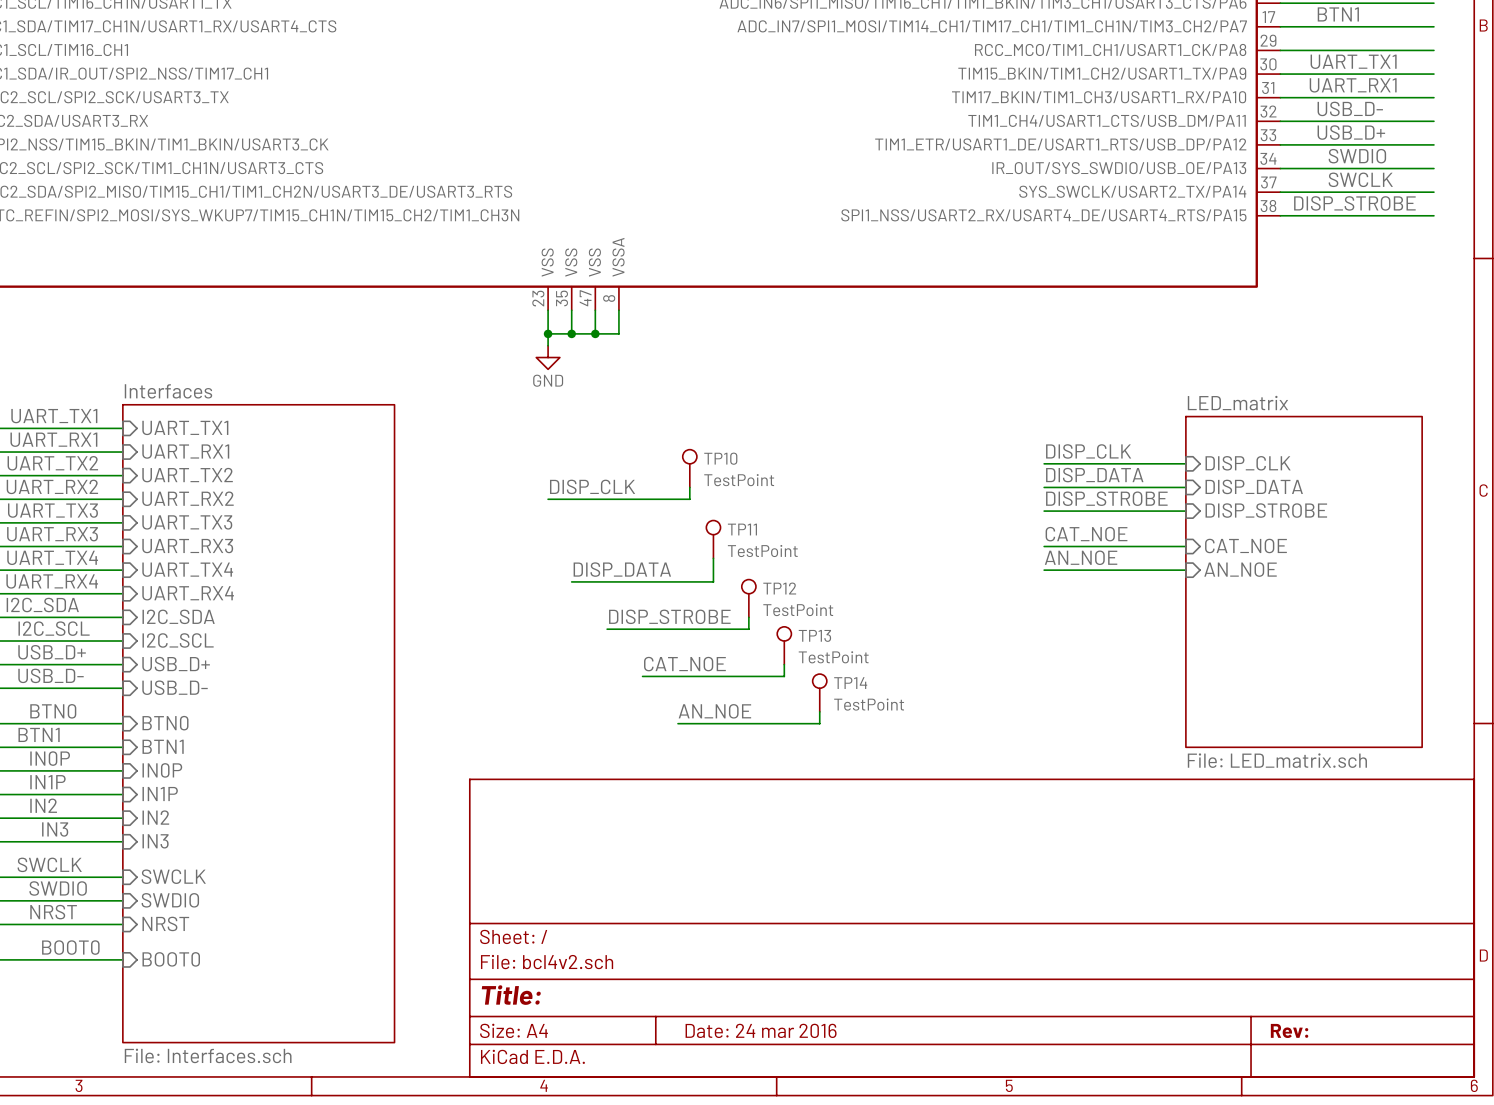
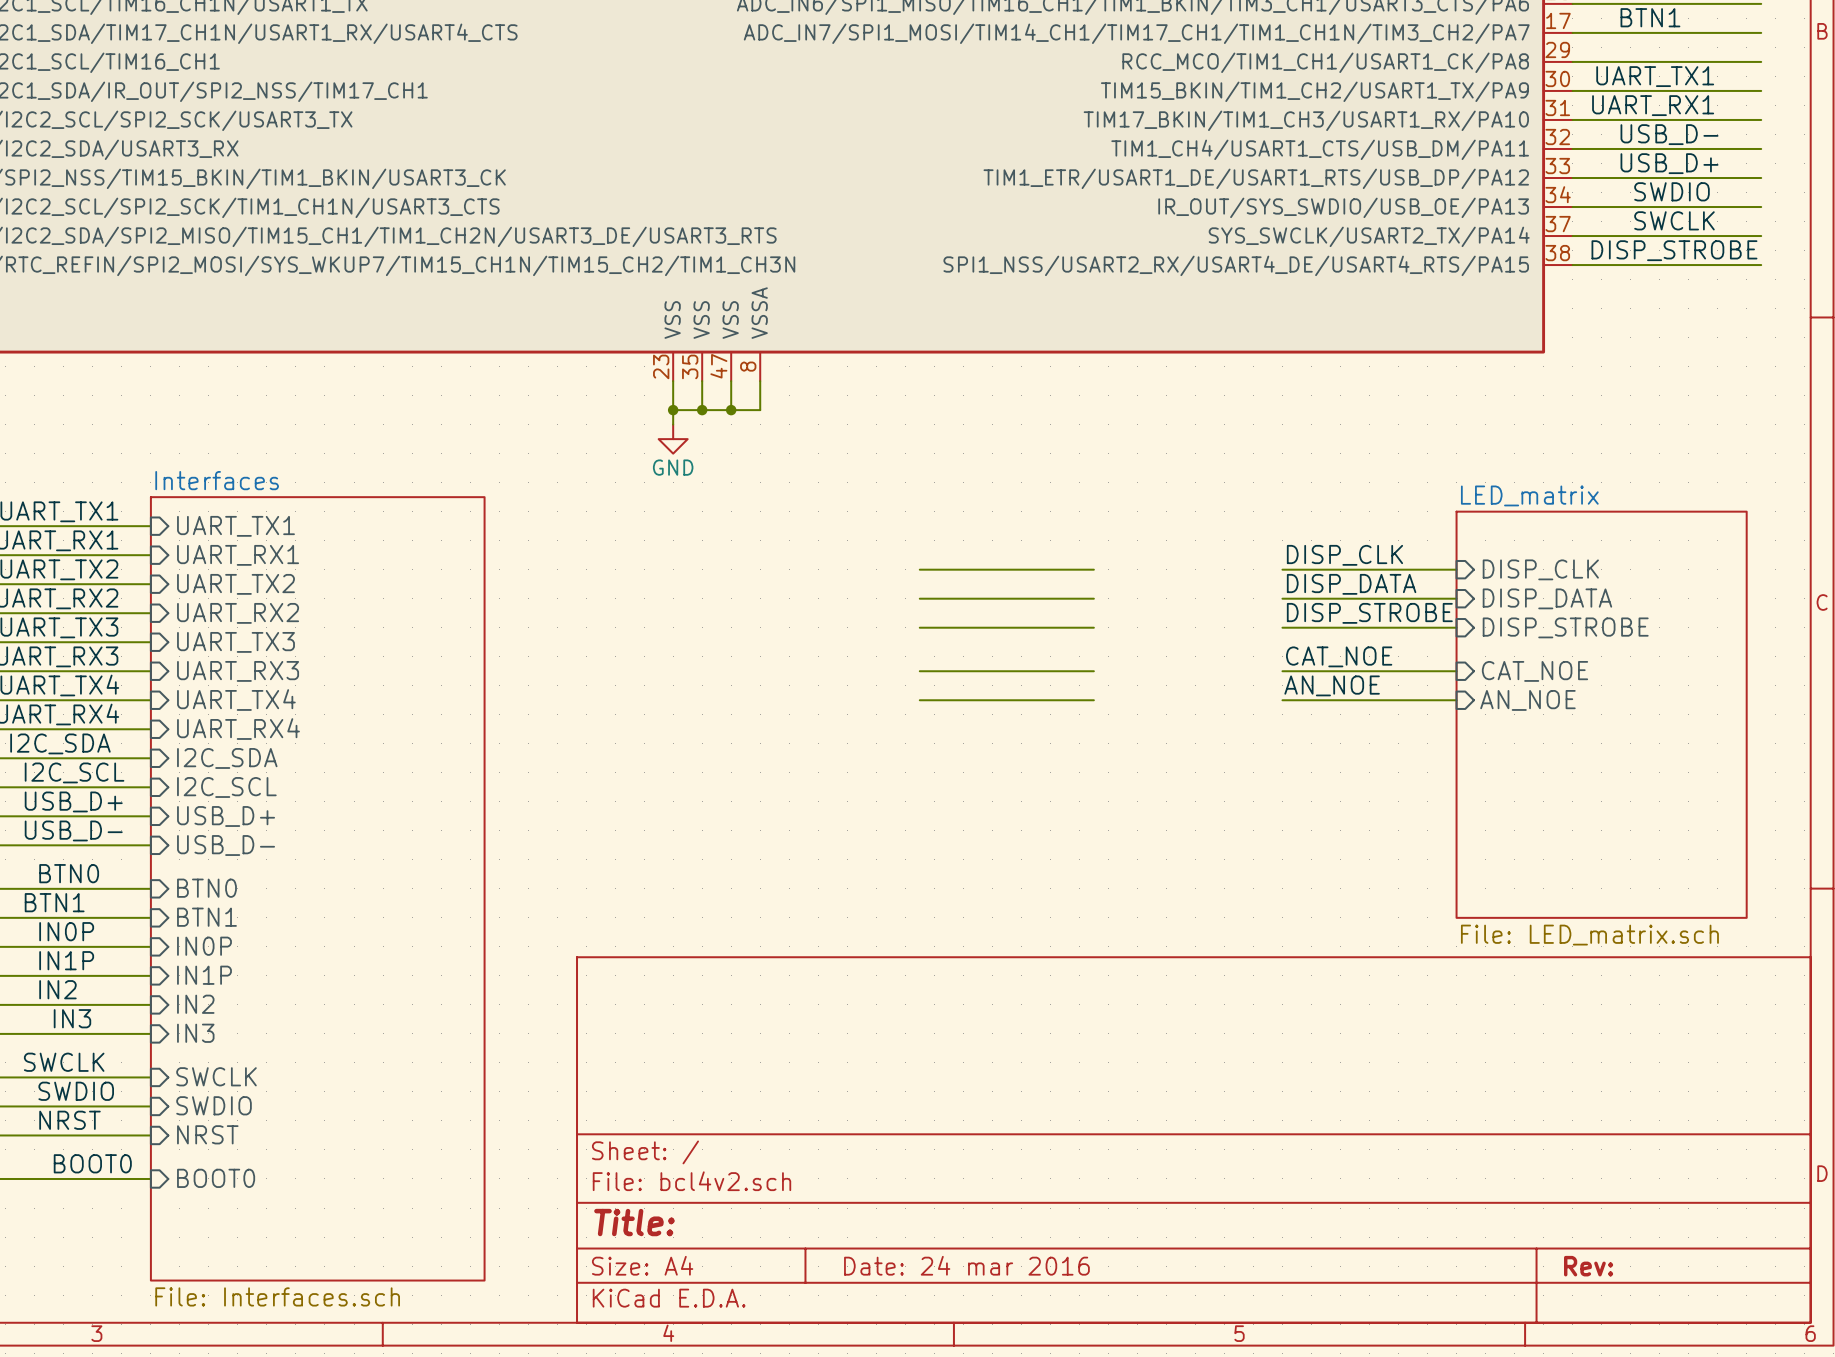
wire: none -> (919, 569) (1093, 569)
TP10: TestPoint (689, 468) -> none
label: DISP_CLK (592, 486) -> none
wire: (689, 487) (689, 499) (548, 499) -> none
wire: none -> (919, 598) (1093, 598)
wire: none -> (919, 627) (1093, 627)
TP11: TestPoint (713, 539) -> none
wire: none -> (919, 671) (1093, 671)
wire: (713, 558) (713, 581) (571, 581) -> none
label: DISP_DATA (622, 569) -> none
wire: none -> (919, 700) (1093, 700)
TP12: TestPoint (748, 598) -> none
label: DISP_STROBE (669, 616) -> none
wire: (748, 617) (748, 629) (607, 629) -> none
TP13: TestPoint (784, 645) -> none
label: CAT_NOE (684, 664) -> none
wire: (784, 664) (784, 676) (642, 676) -> none
TP14: TestPoint (819, 692) -> none
label: AN_NOE (714, 711) -> none
wire: (819, 711) (819, 723) (678, 723) -> none

